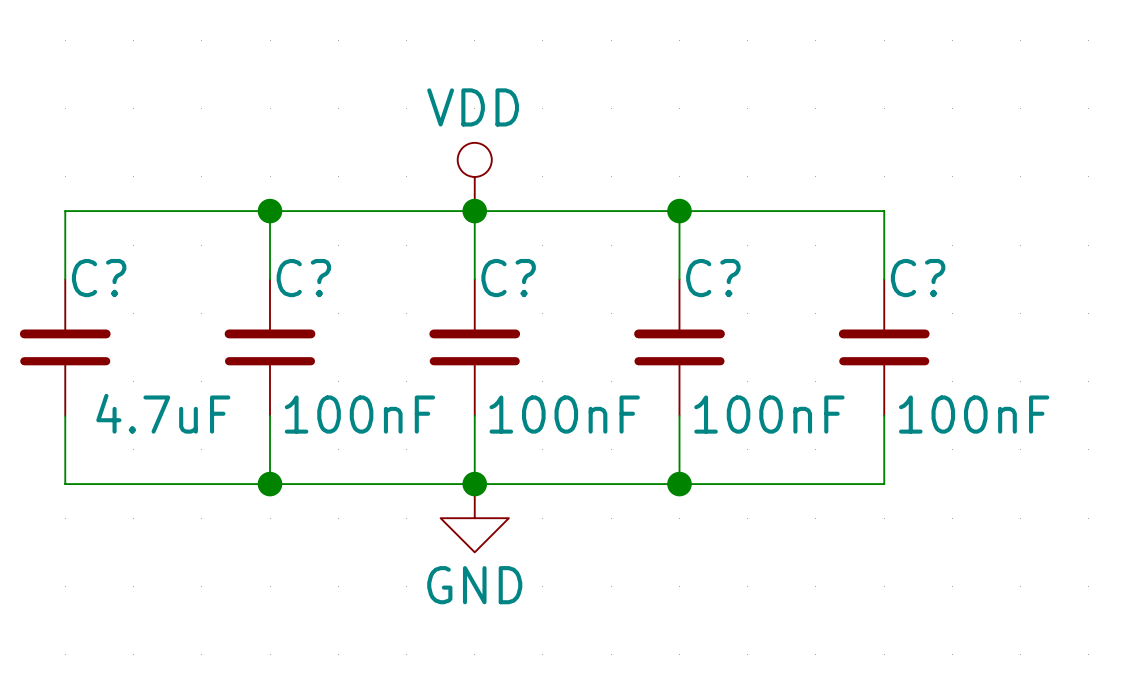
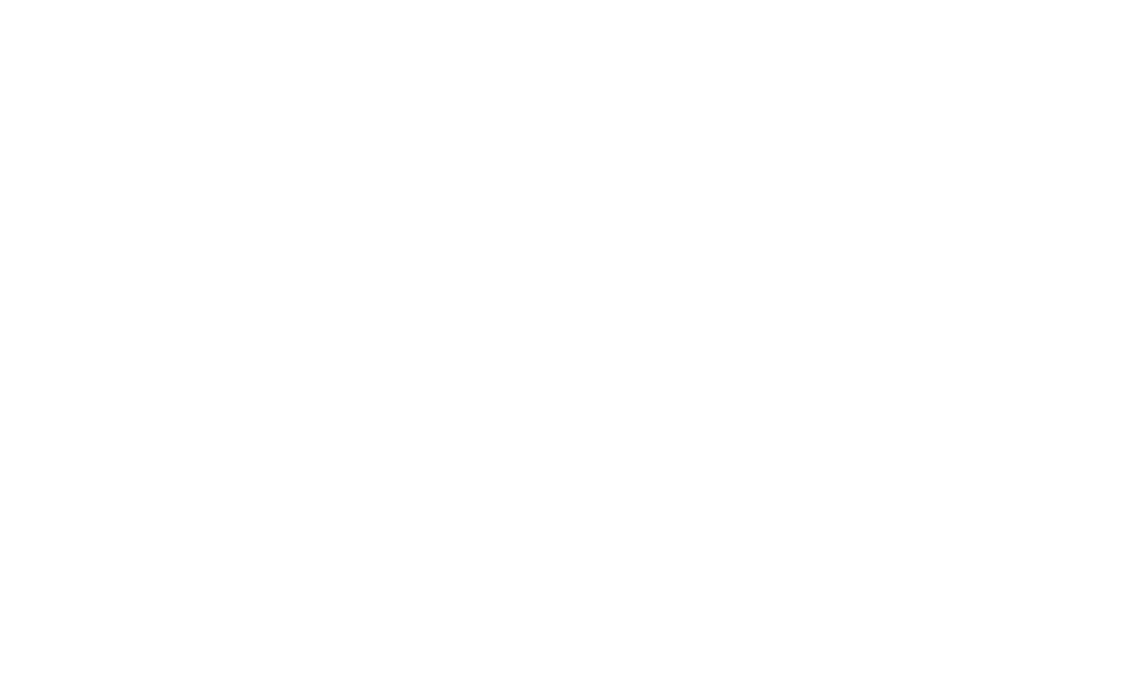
power symbol: VDD (474, 176) -> none
wire: (270, 211) (270, 279) -> none
junction: (270, 211) -> none
wire: (474, 211) (474, 279) -> none
junction: (474, 211) -> none
wire: (679, 211) (679, 279) -> none
junction: (679, 211) -> none
wire: (65, 279) (65, 211) (884, 211) (884, 279) -> none
C?: 4.7uF (65, 347) -> none
C?: 100nF (270, 347) -> none
C?: 100nF (474, 347) -> none
C?: 100nF (679, 347) -> none
C?: 100nF (884, 347) -> none
wire: (65, 415) (65, 484) (884, 484) (884, 415) -> none
wire: (270, 415) (270, 484) -> none
wire: (474, 415) (474, 484) -> none
wire: (679, 415) (679, 484) -> none
junction: (270, 484) -> none
junction: (474, 484) -> none
junction: (679, 484) -> none
power symbol: GND (474, 518) -> none

